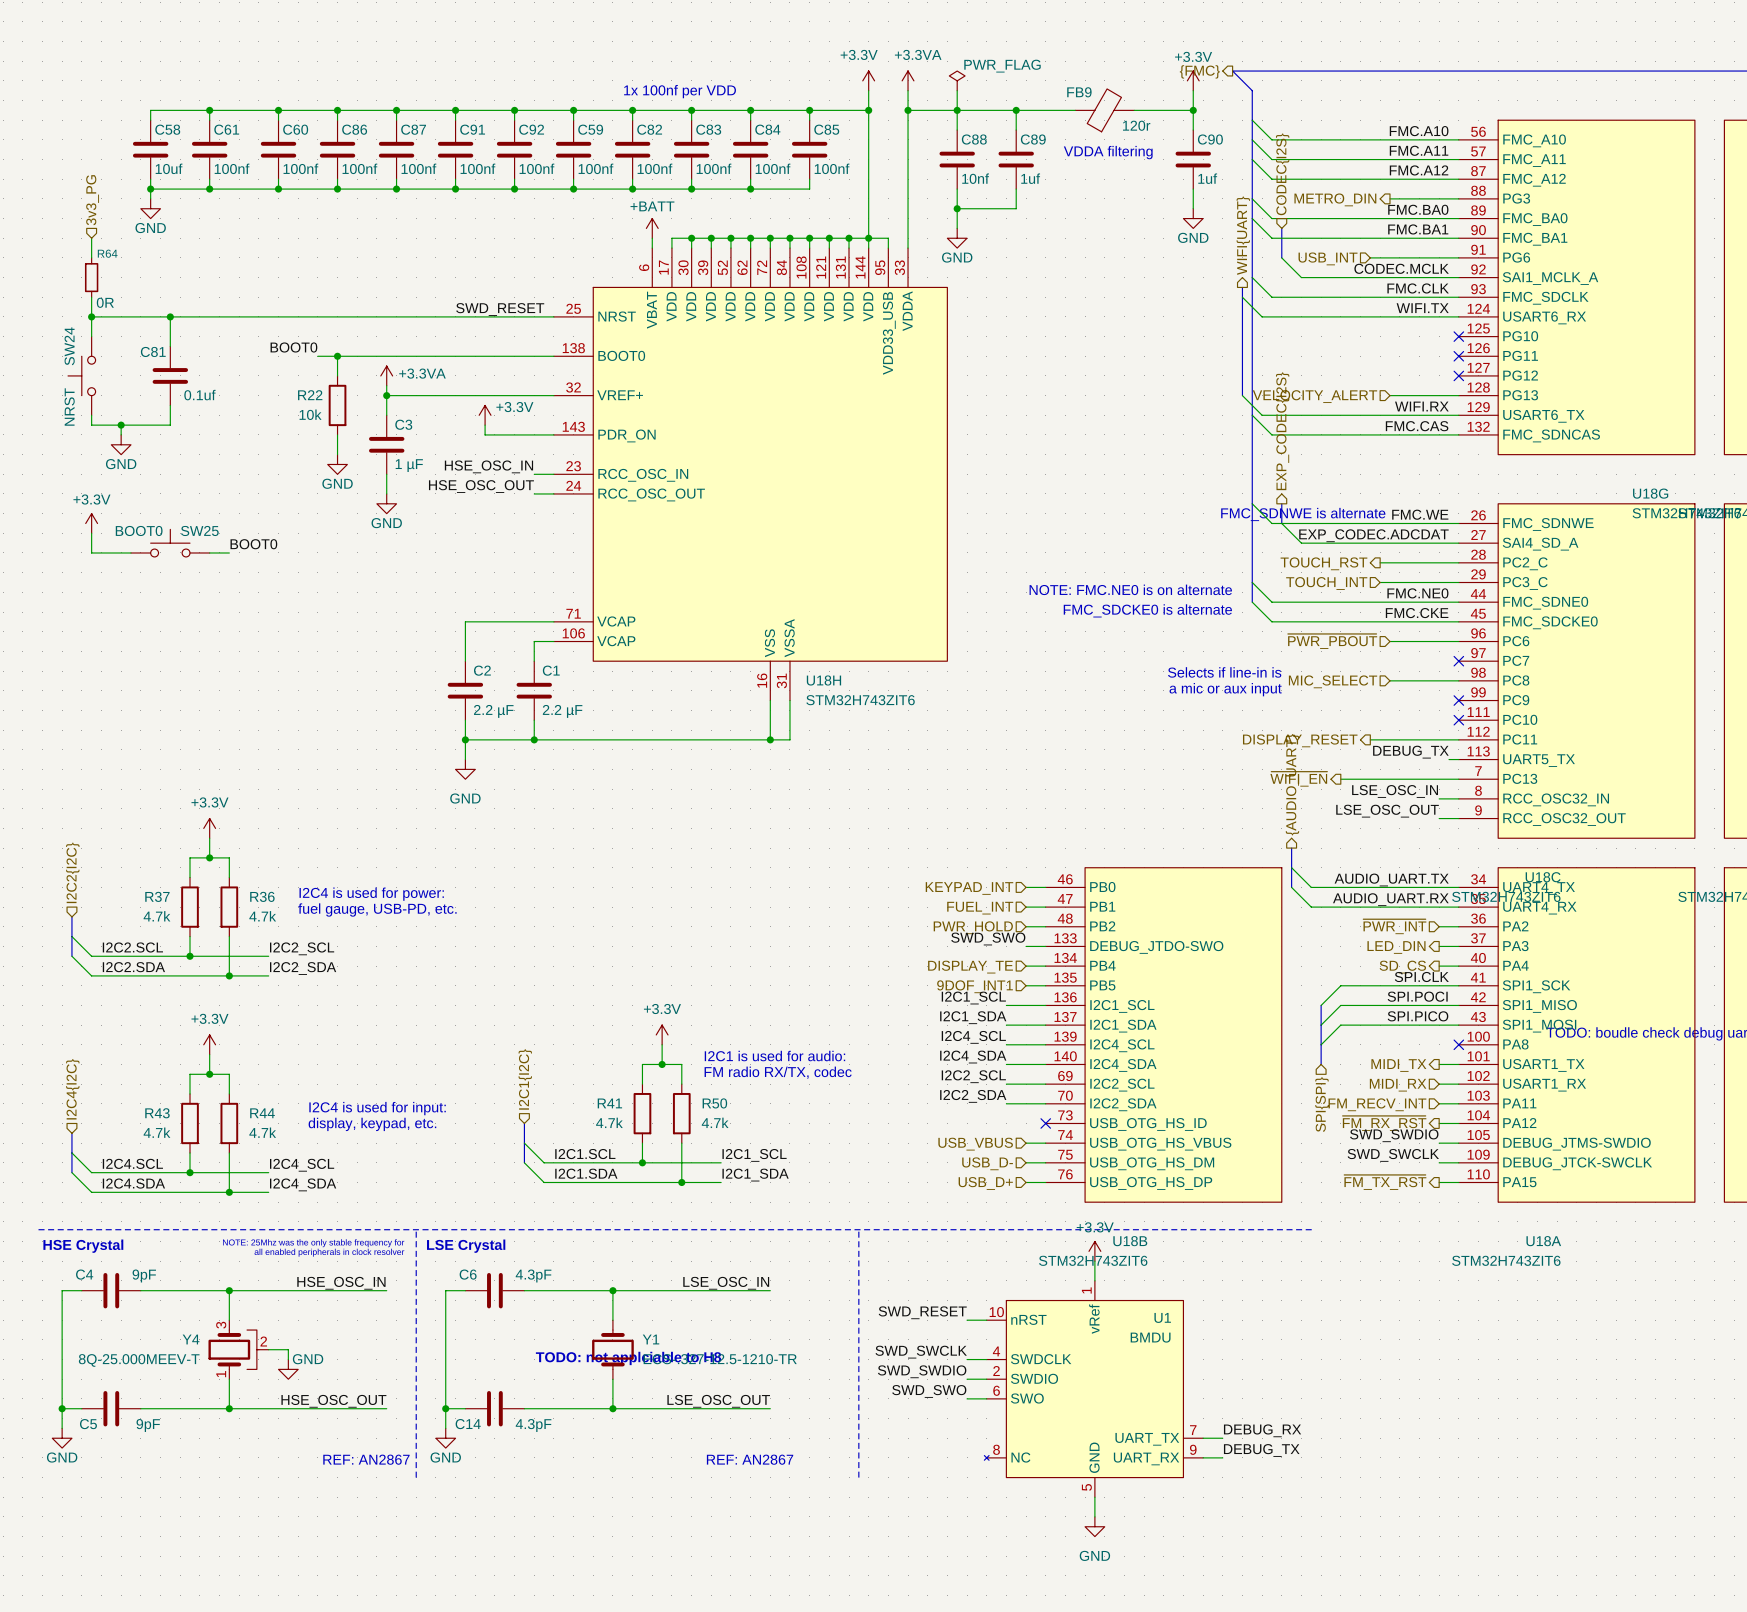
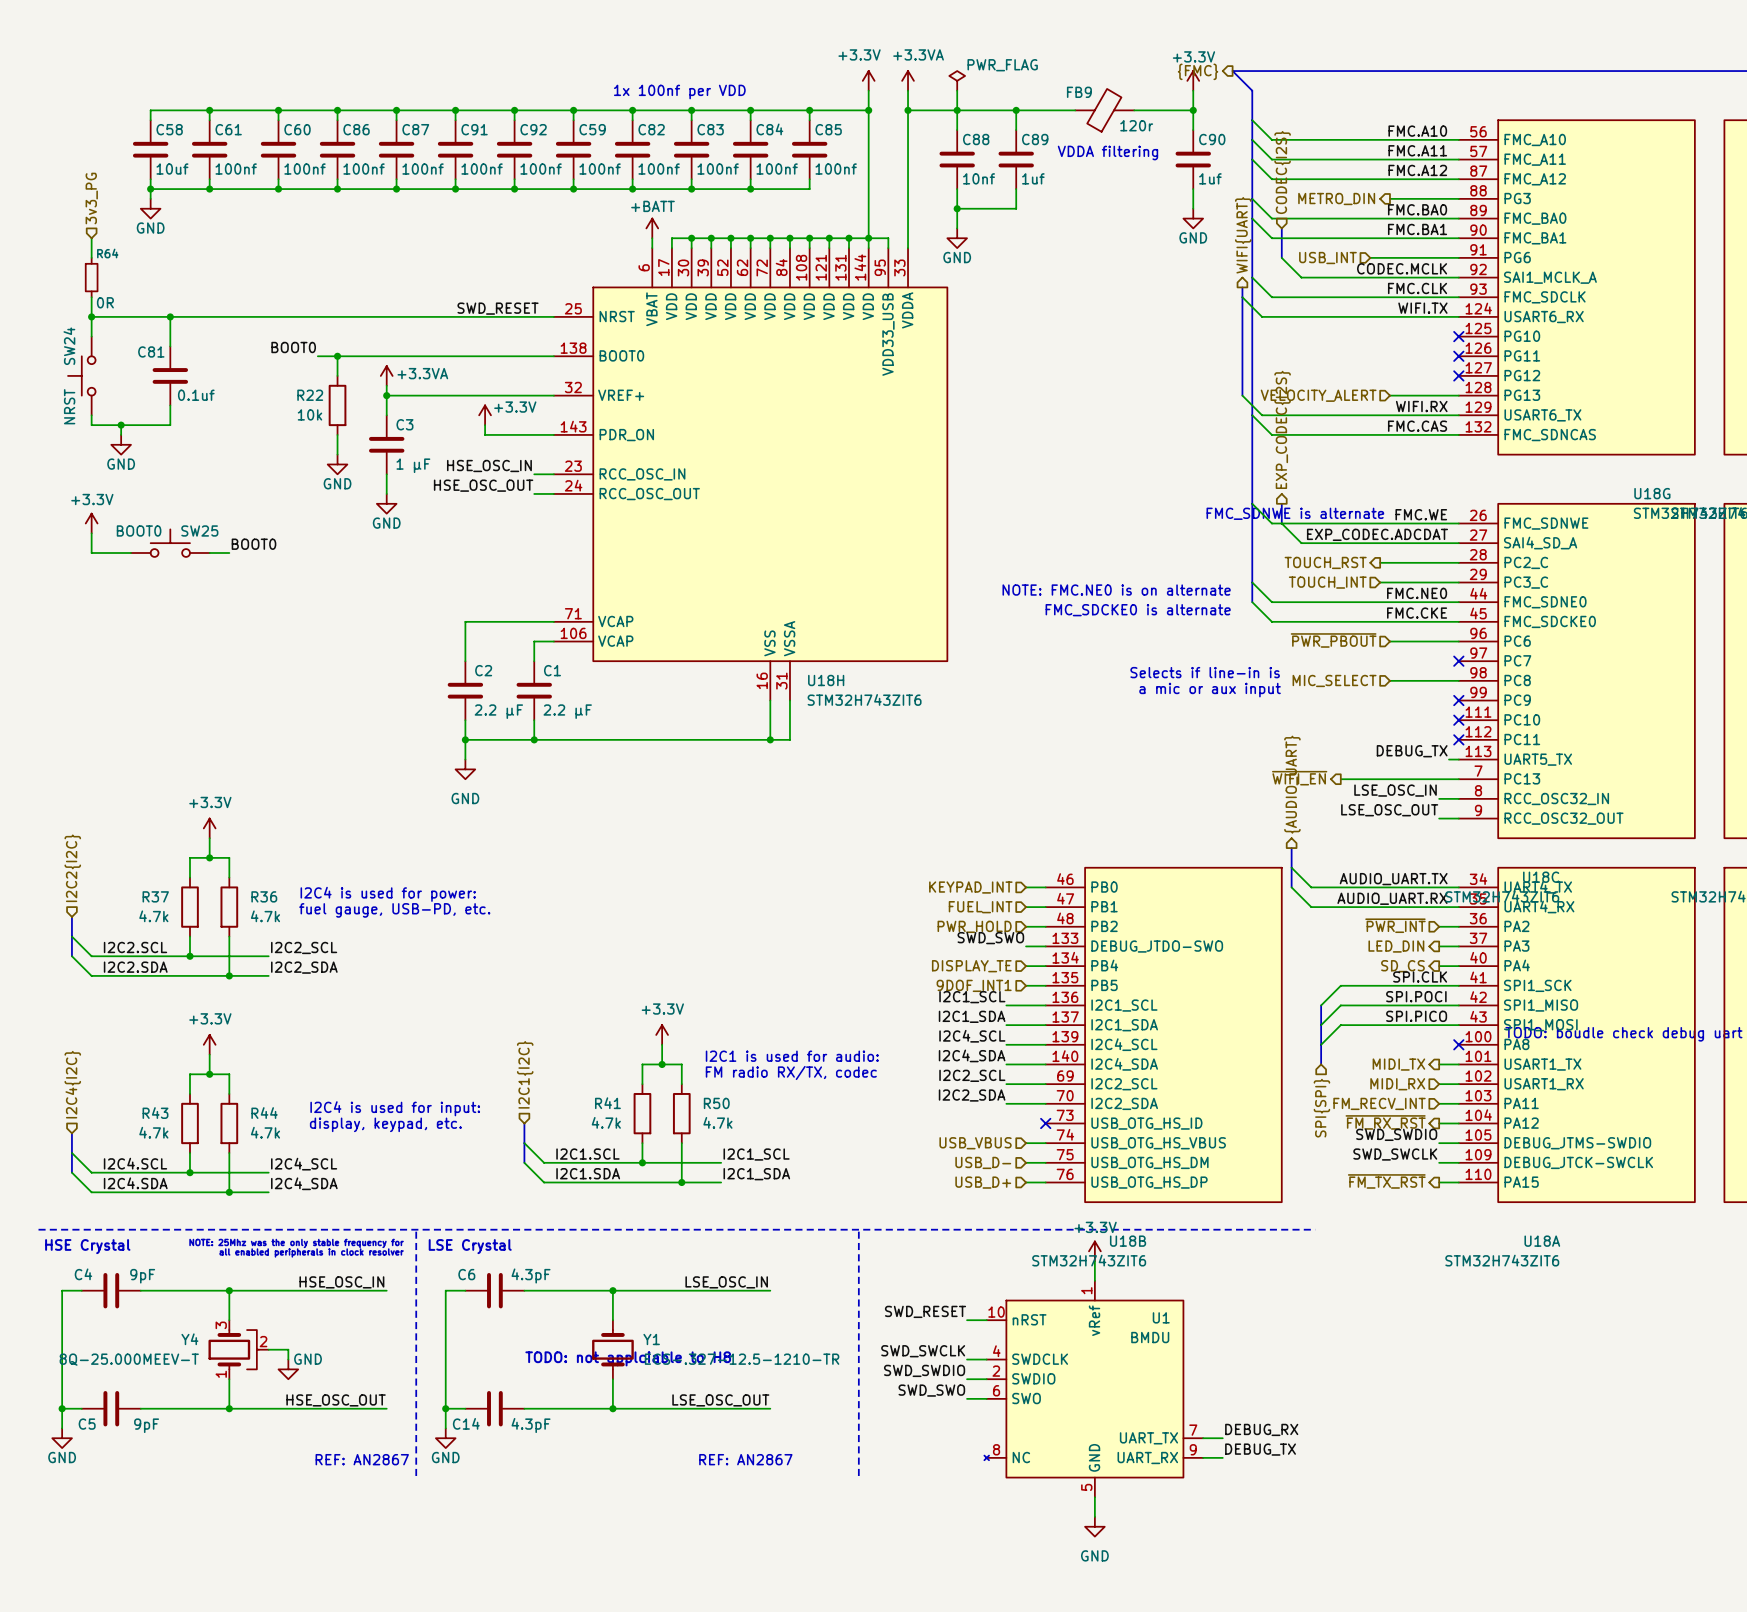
wire: (1370, 739) (1458, 739) -> none
no-connect mark: none -> (1458, 739)
hierarchical label: DISPLAY_RESET (1300, 740) -> none

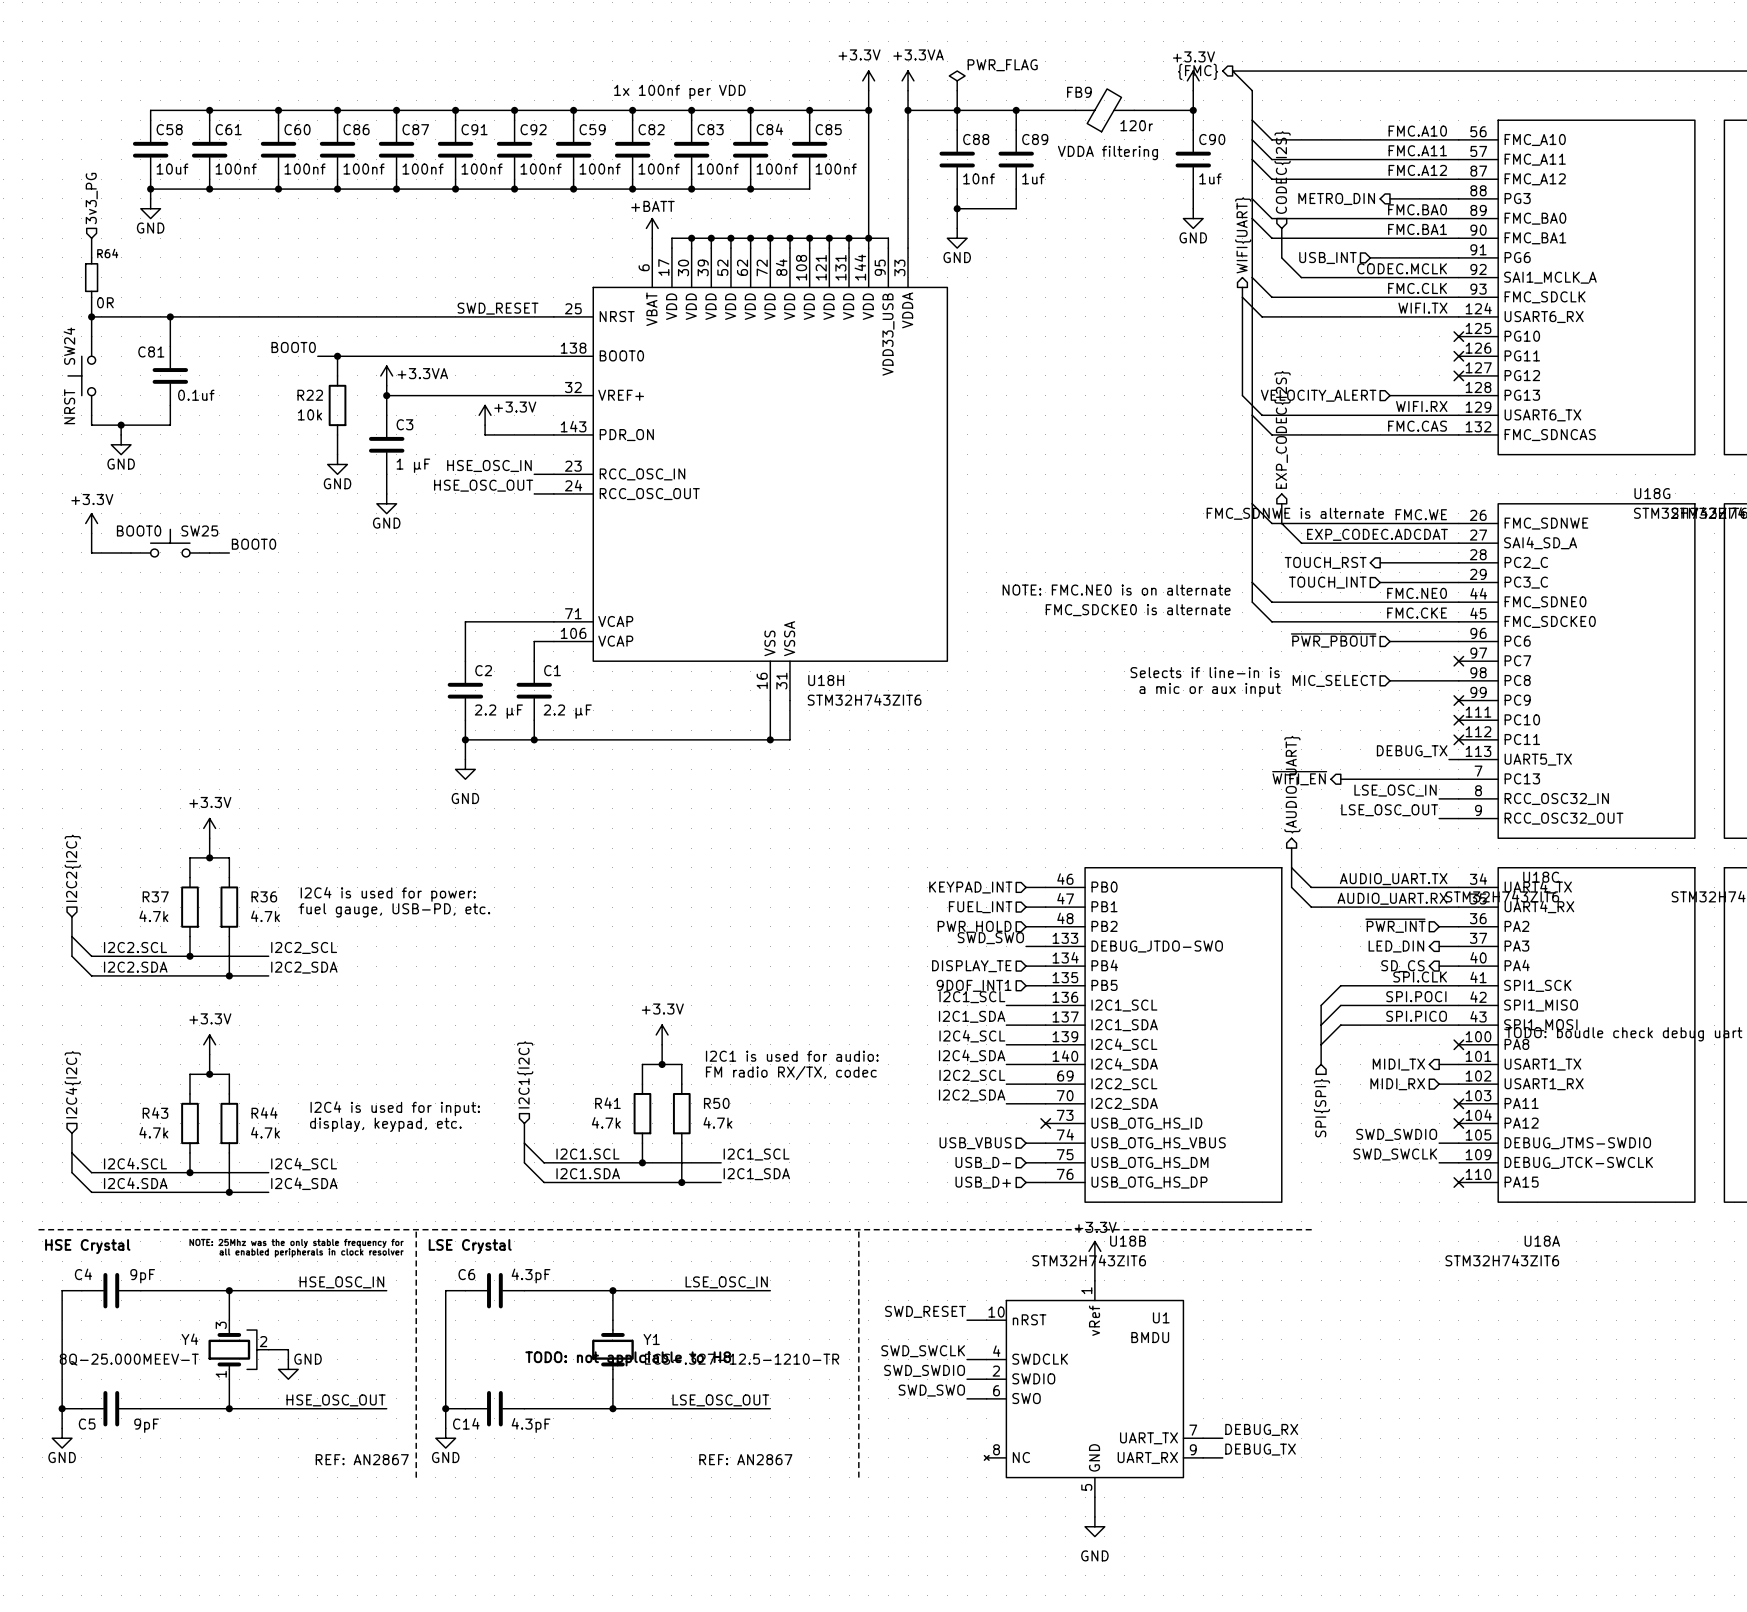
hierarchical label: FM_RECV_INT (1379, 1103) -> none
wire: (1439, 1103) (1458, 1103) -> none
no-connect mark: none -> (1458, 1103)
hierarchical label: ~{FM_RX_RST} (1385, 1122) -> none
wire: (1439, 1123) (1458, 1123) -> none
no-connect mark: none -> (1458, 1123)
hierarchical label: ~{FM_TX_RST} (1386, 1181) -> none
wire: (1439, 1182) (1458, 1182) -> none
no-connect mark: none -> (1458, 1182)

